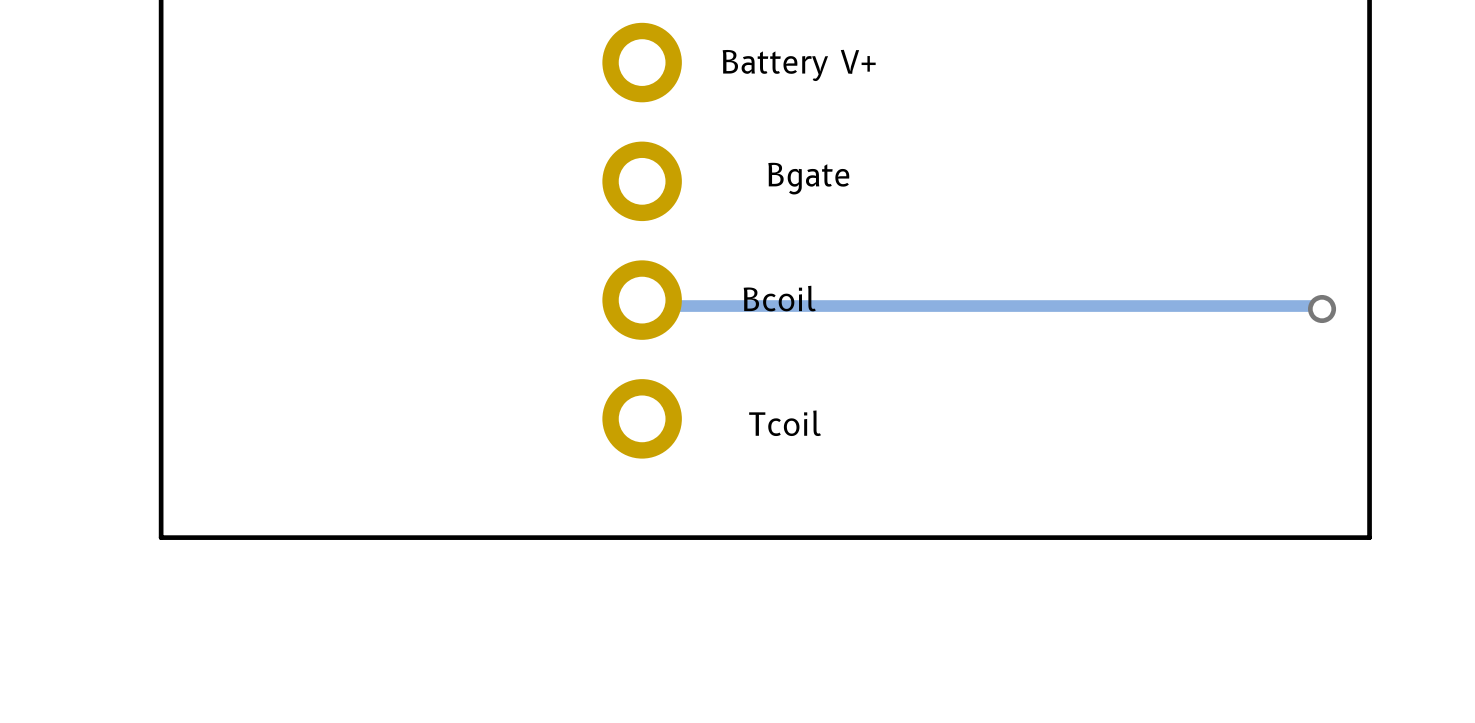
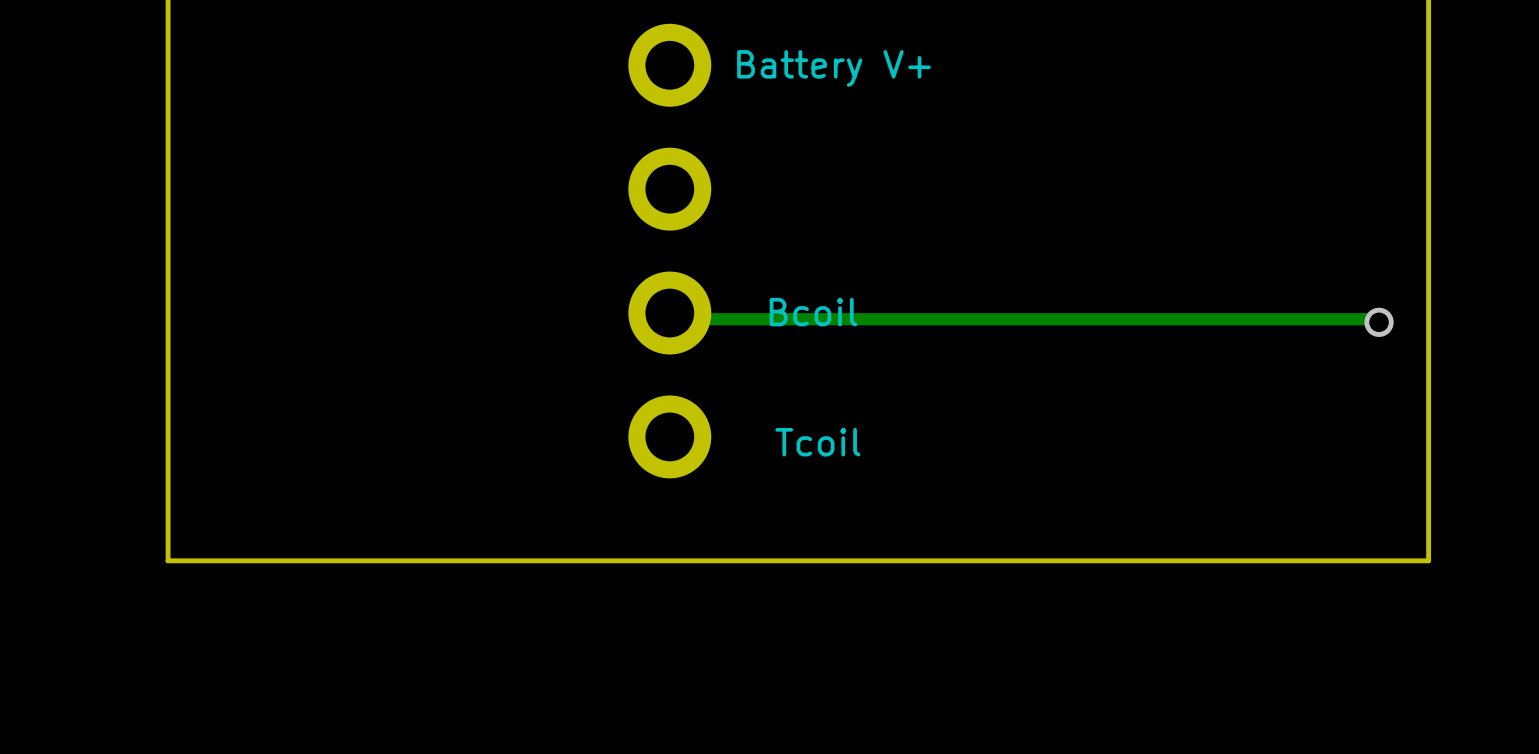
text: Bgate (808, 178) -> none

